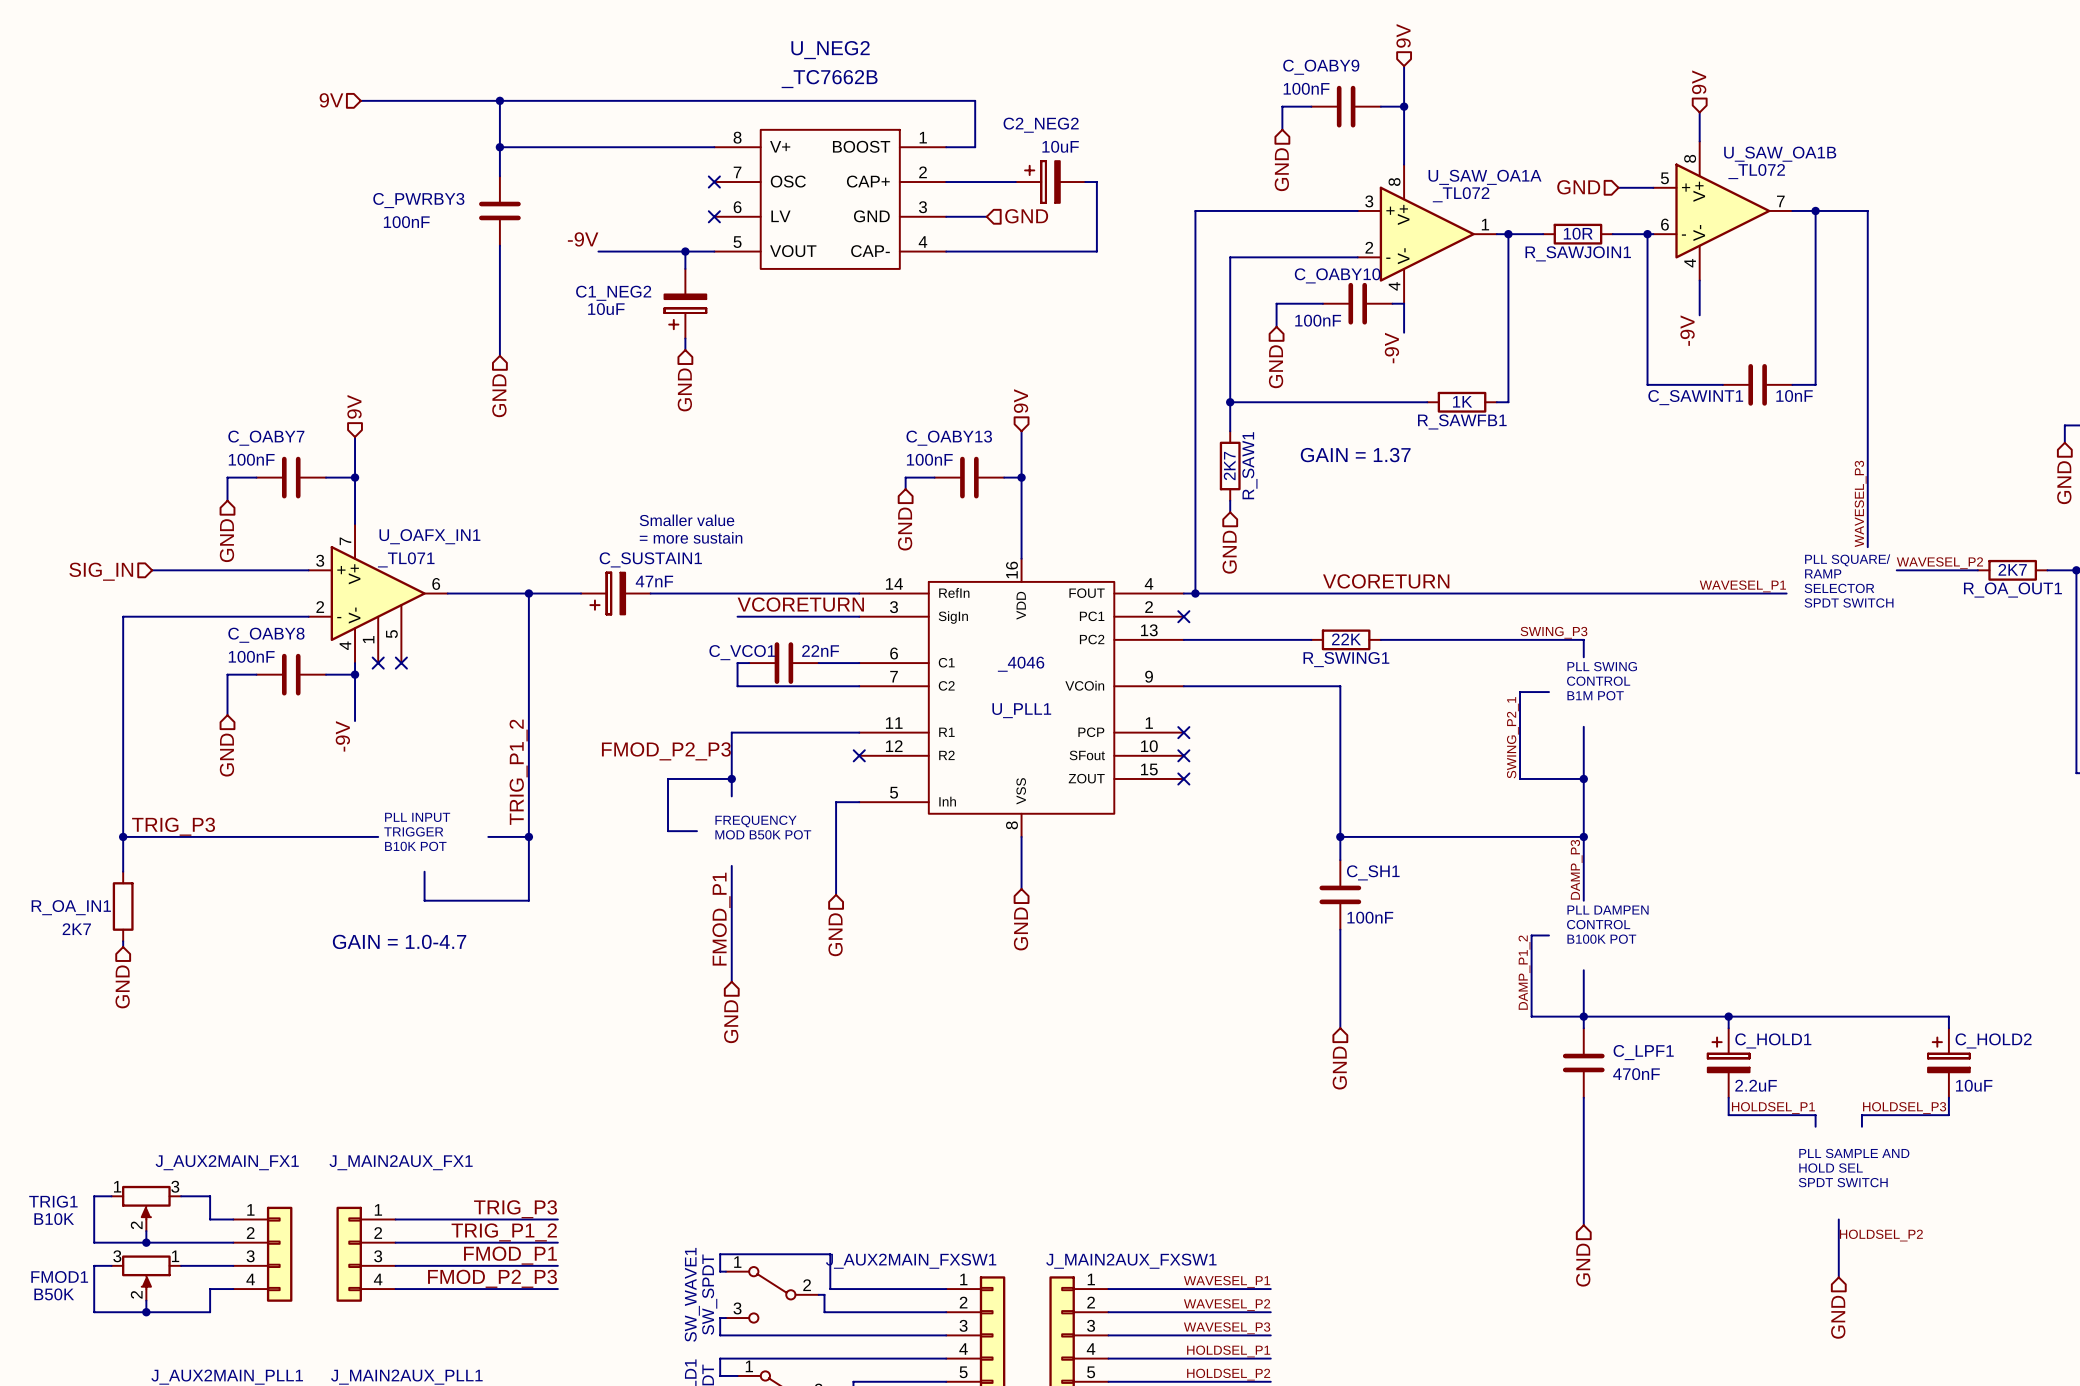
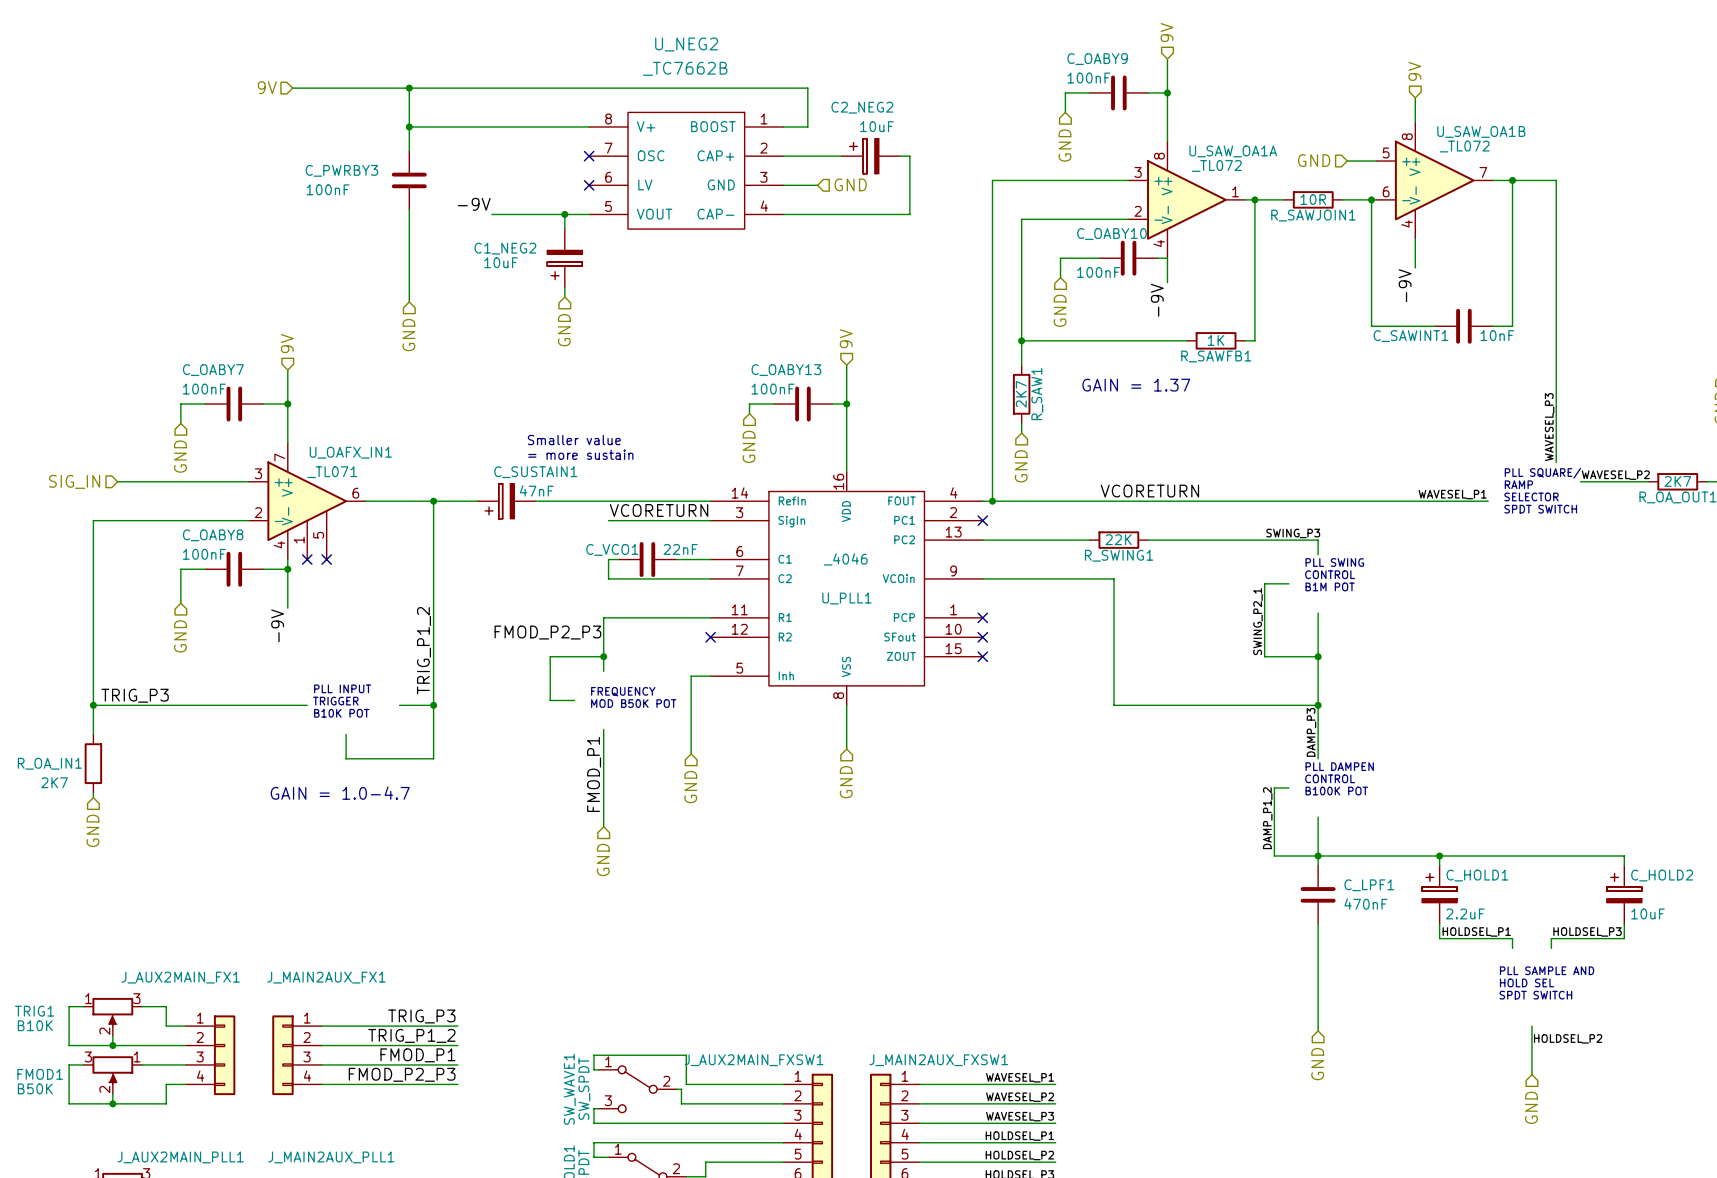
wire: (1340, 836) (1340, 860) -> none
junction: (1340, 836) -> none
C_SH1: 100nF (1340, 894) -> none
wire: (1340, 929) (1340, 1028) -> none
hierarchical label: GND (1339, 1068) -> none

